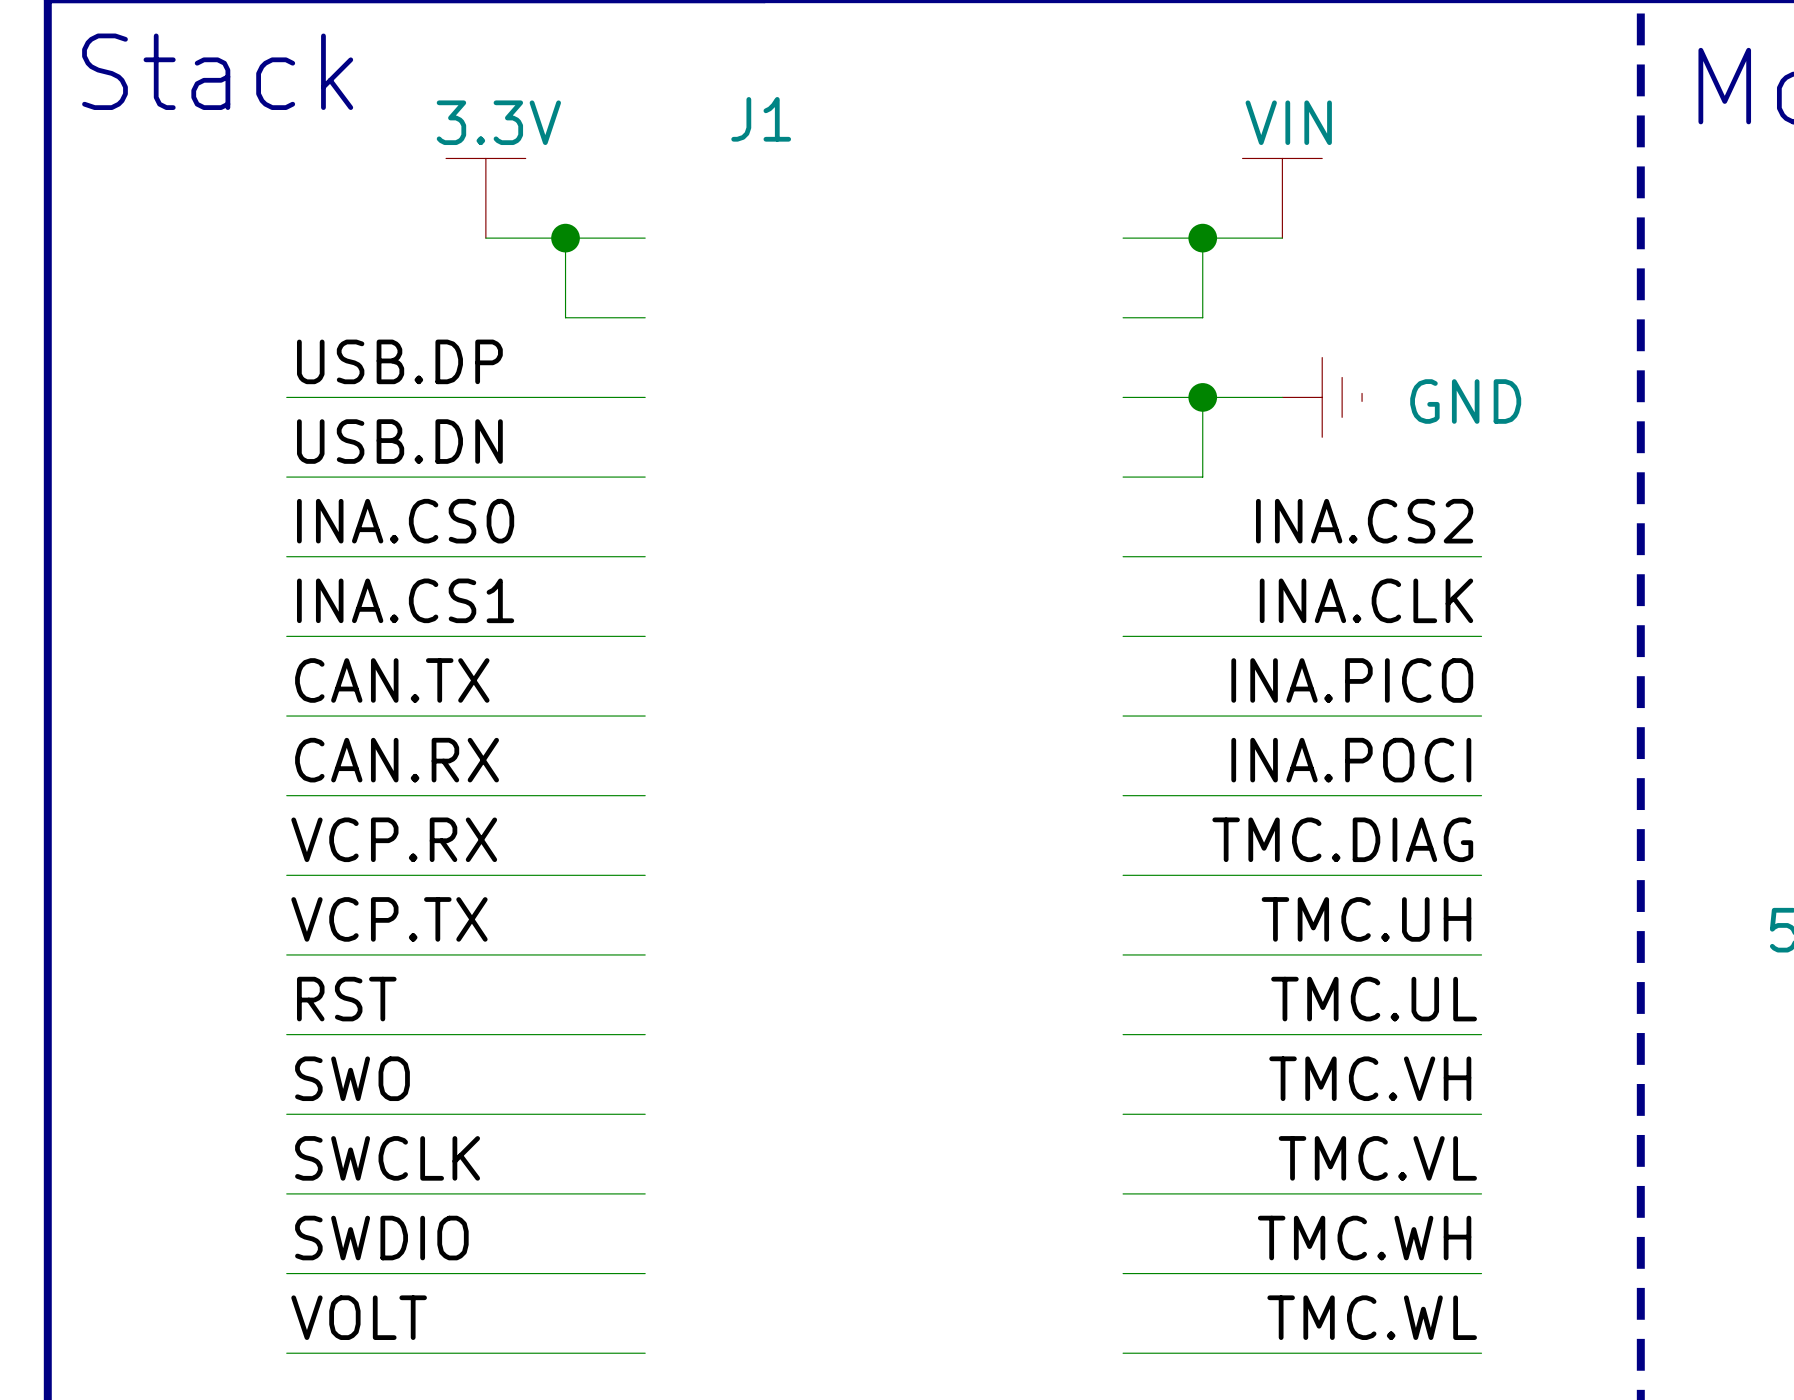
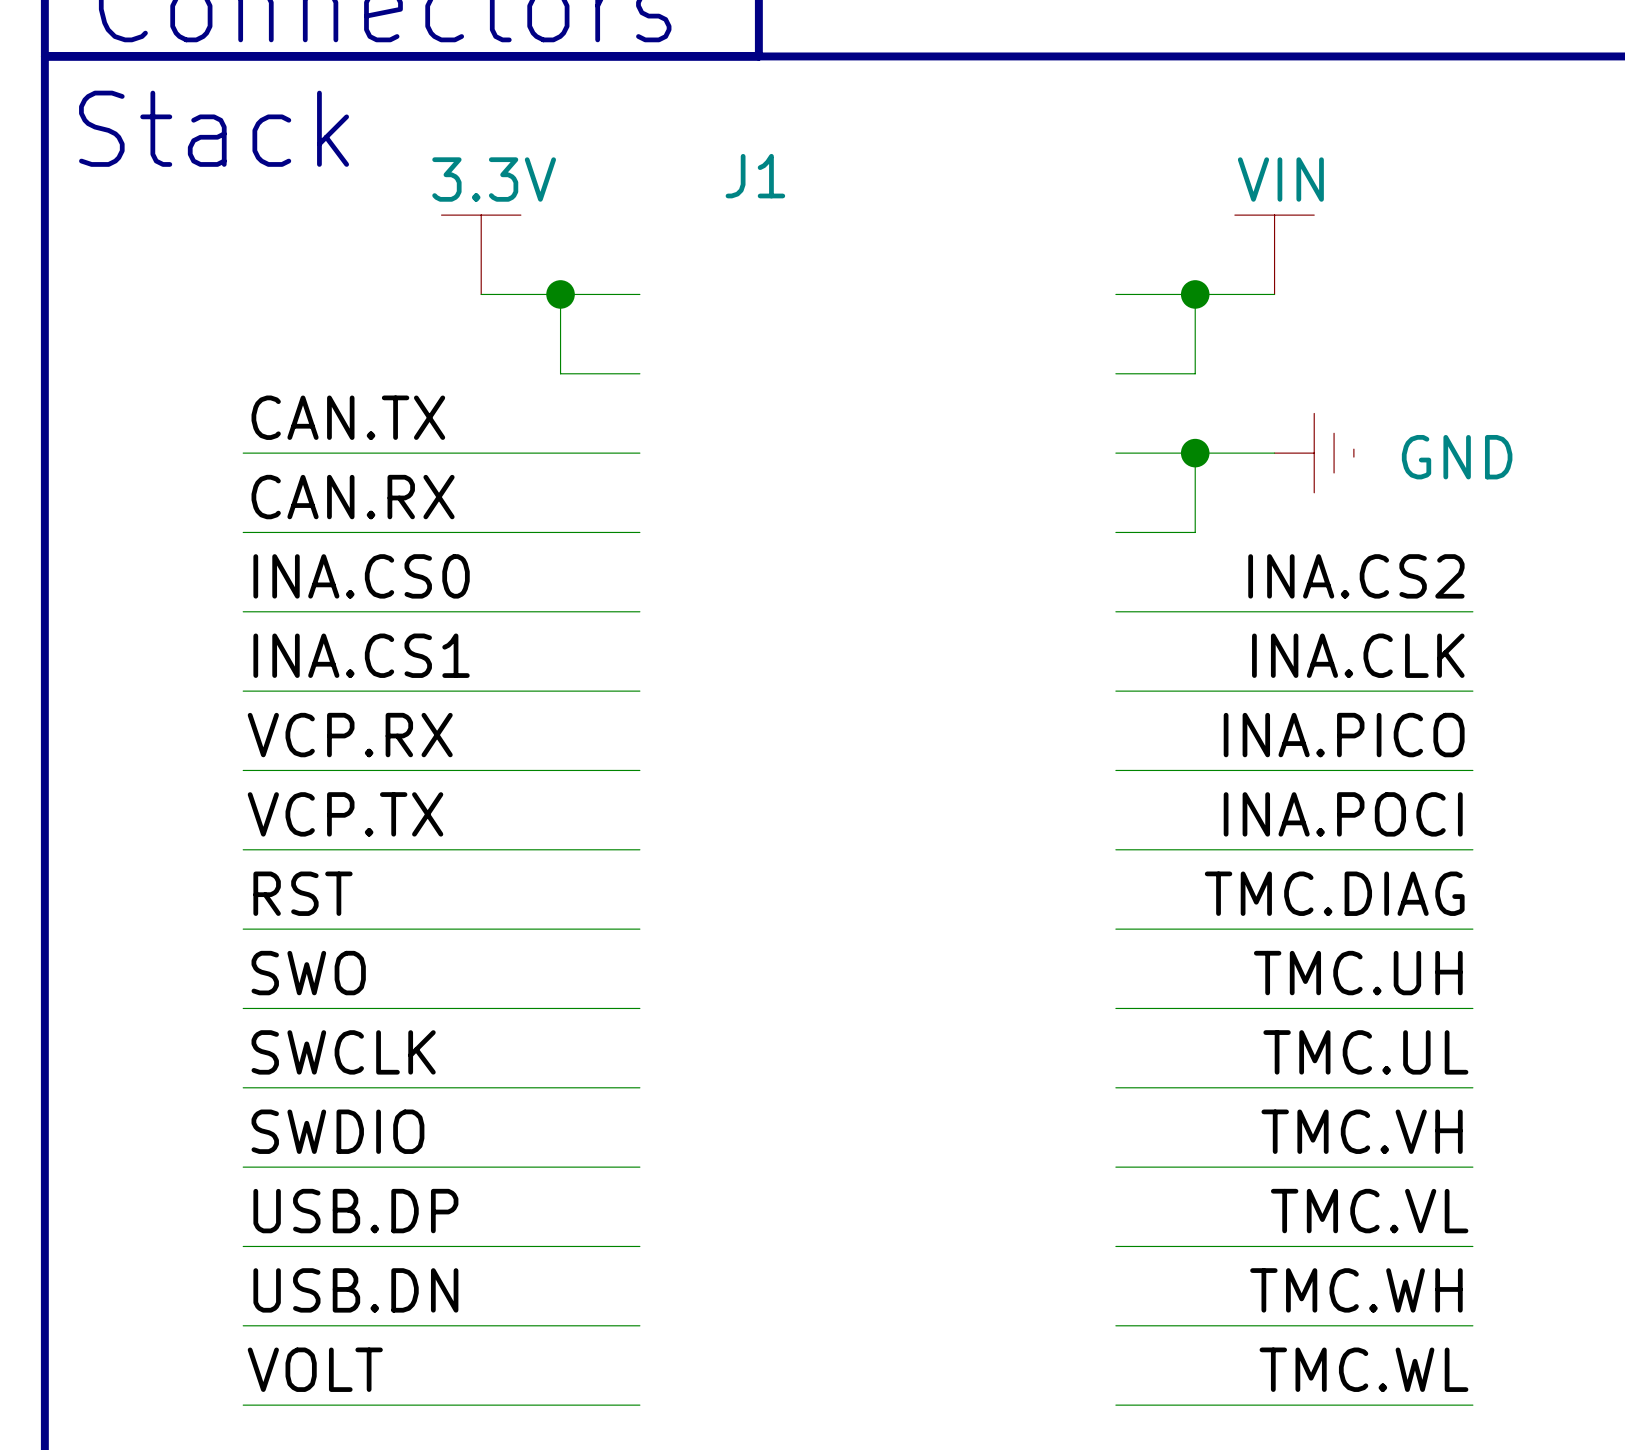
label: USB.DP (399, 361) -> none
wire: none -> (243, 453) (282, 453)
label: USB.DN (399, 441) -> none
wire: none -> (243, 532) (282, 532)
label position: INA.CS0 (405, 521) -> INA.CS0 (361, 576)
wire: none -> (243, 611) (282, 611)
label position: INA.CS1 (405, 600) -> INA.CS1 (361, 655)
wire: none -> (243, 691) (282, 691)
label position: CAN.TX (392, 680) -> CAN.TX (348, 417)
wire: none -> (243, 770) (282, 770)
label position: CAN.RX (397, 760) -> CAN.RX (353, 497)
wire: none -> (243, 849) (282, 849)
label position: VCP.RX (394, 839) -> VCP.RX (350, 735)
wire: none -> (243, 929) (282, 929)
label position: VCP.TX (389, 919) -> VCP.TX (345, 814)
wire: none -> (243, 1008) (282, 1008)
label position: RST (346, 999) -> RST (303, 893)
wire: none -> (243, 1087) (282, 1087)
label position: SWO (352, 1078) -> SWO (308, 973)
wire: none -> (243, 1167) (282, 1167)
label: none -> USB.DP (355, 1211)
label position: SWCLK (387, 1158) -> SWCLK (343, 1052)
wire: none -> (243, 1246) (282, 1246)
label: none -> USB.DN (355, 1290)
label position: SWDIO (381, 1238) -> SWDIO (337, 1131)
wire: none -> (243, 1325) (282, 1325)
label position: VOLT (359, 1317) -> VOLT (315, 1369)
wire: none -> (243, 1405) (282, 1405)

